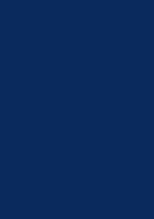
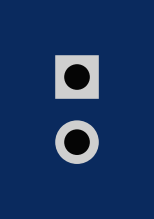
part: none -> (77, 109)

